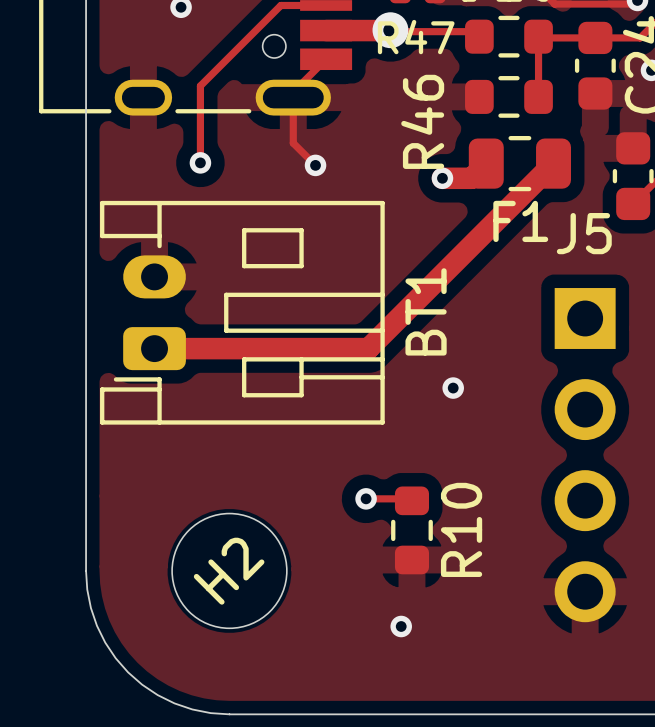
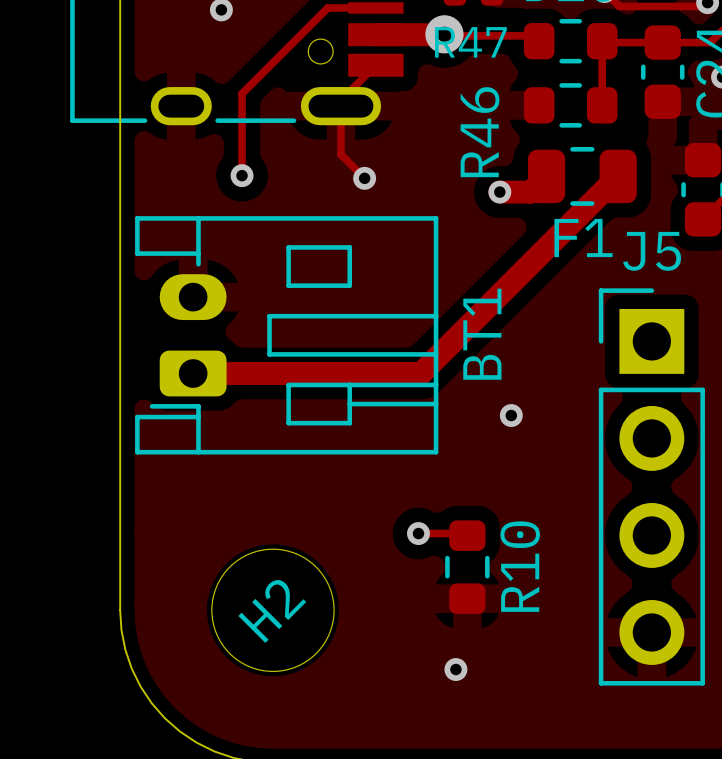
J5 footprint: [554, 288, 616, 623] -> [598, 288, 705, 686]

